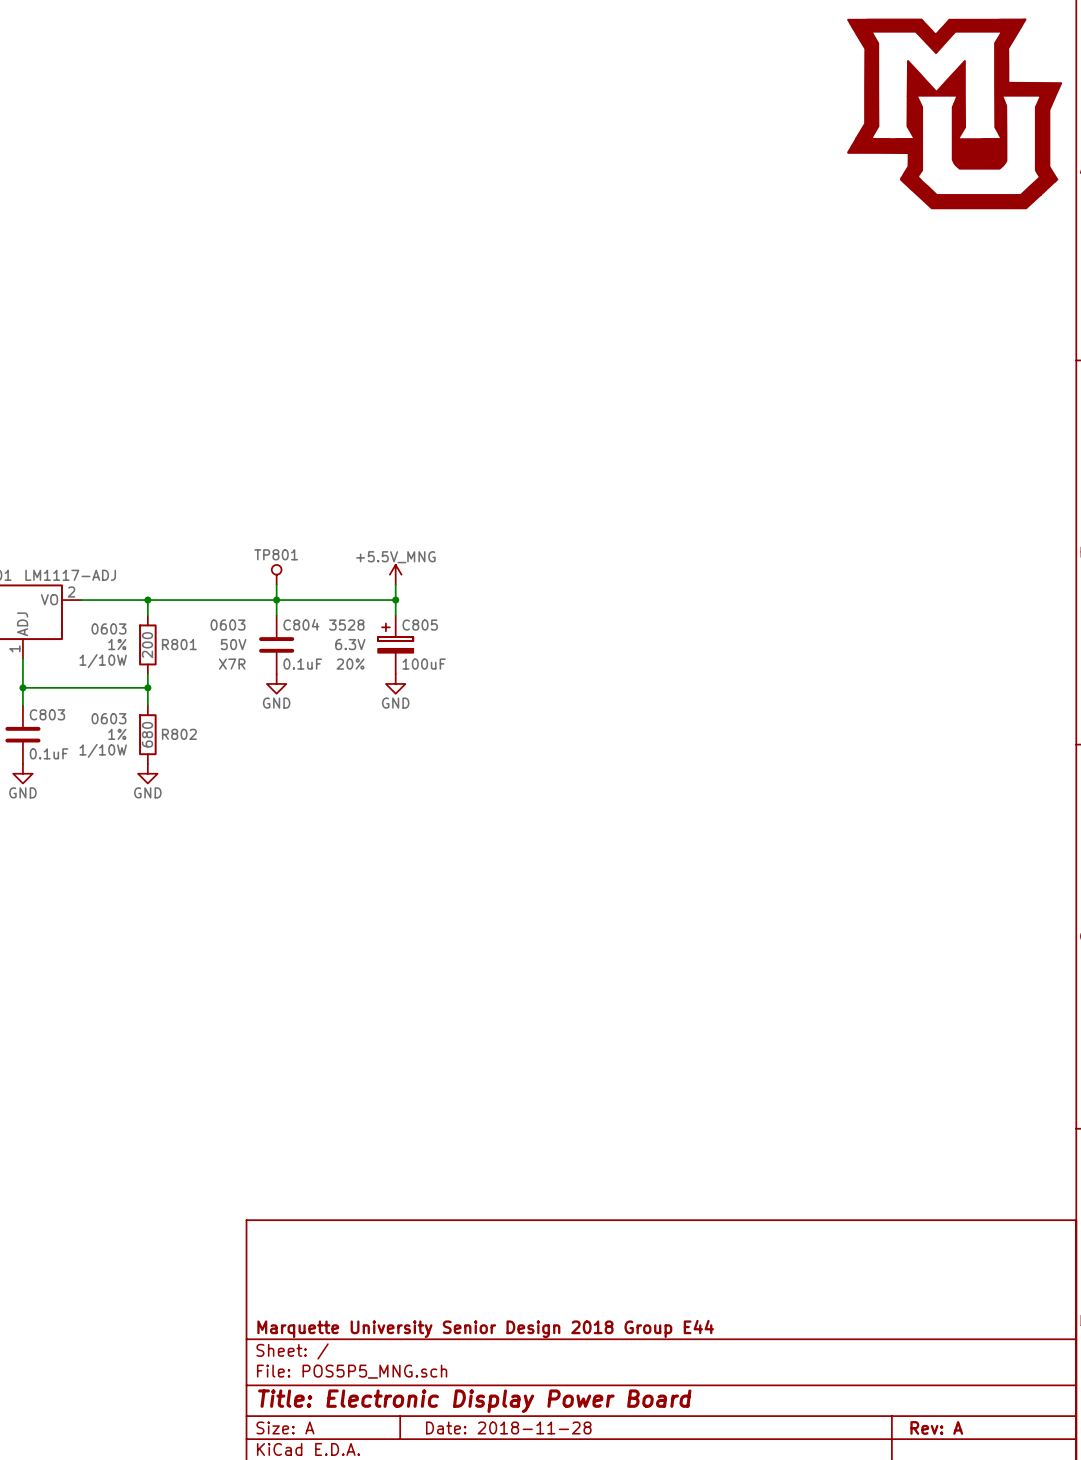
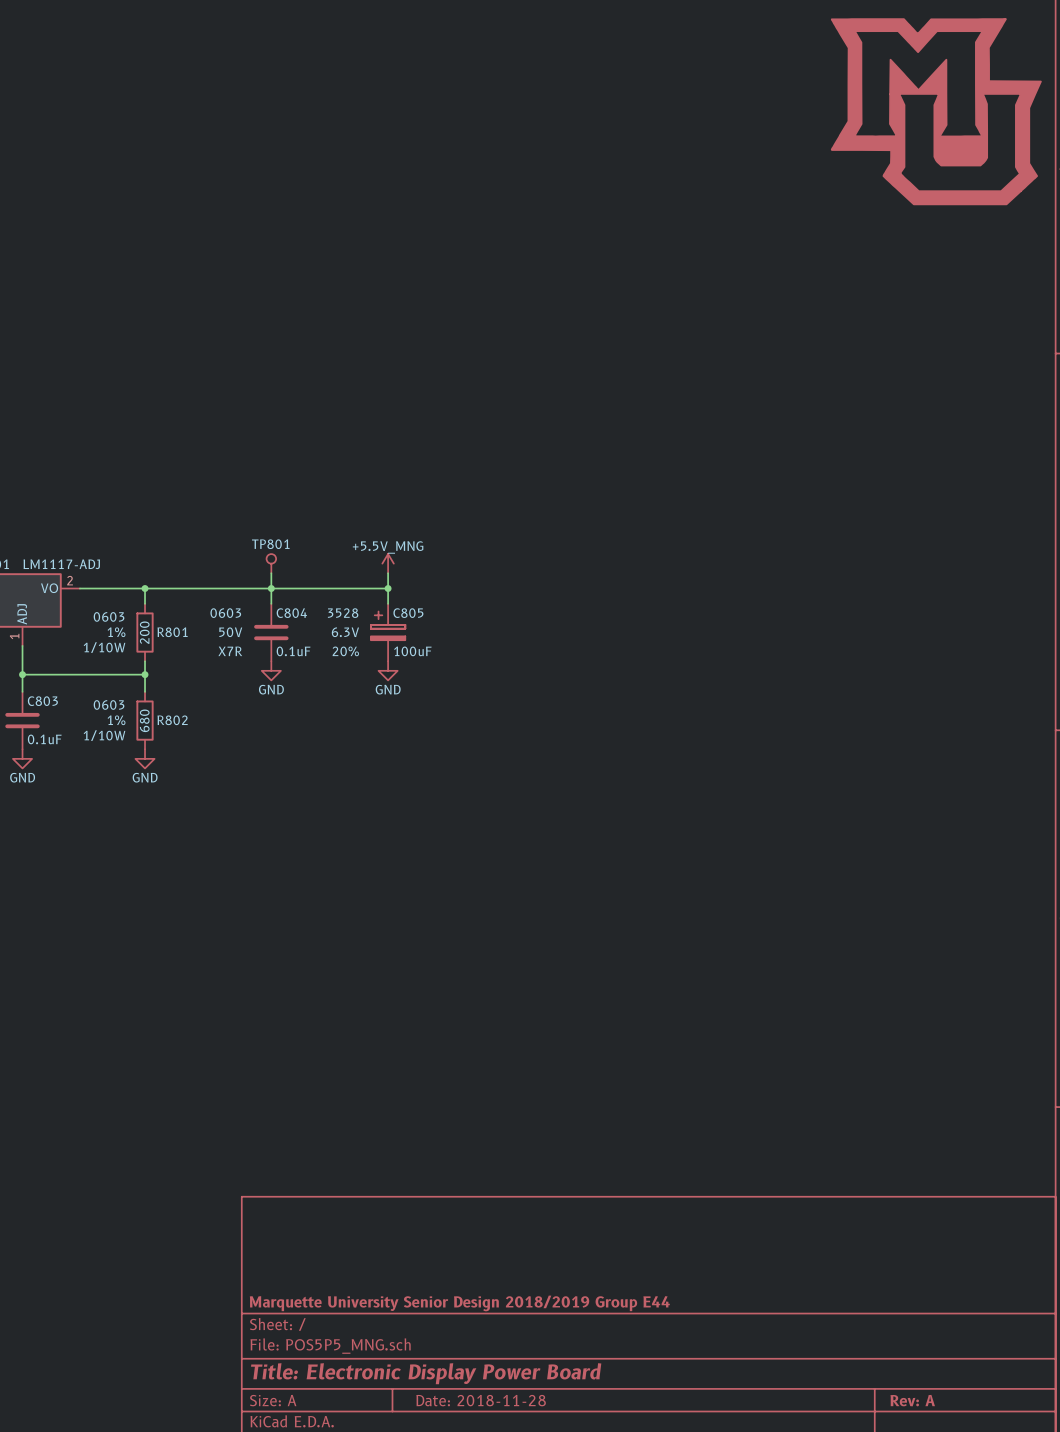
title block: Marquette University Senior Design 2018 Group E44 (485, 1328) -> Marquette University Senior Design 2018/2019 Group E44 (459, 1303)

